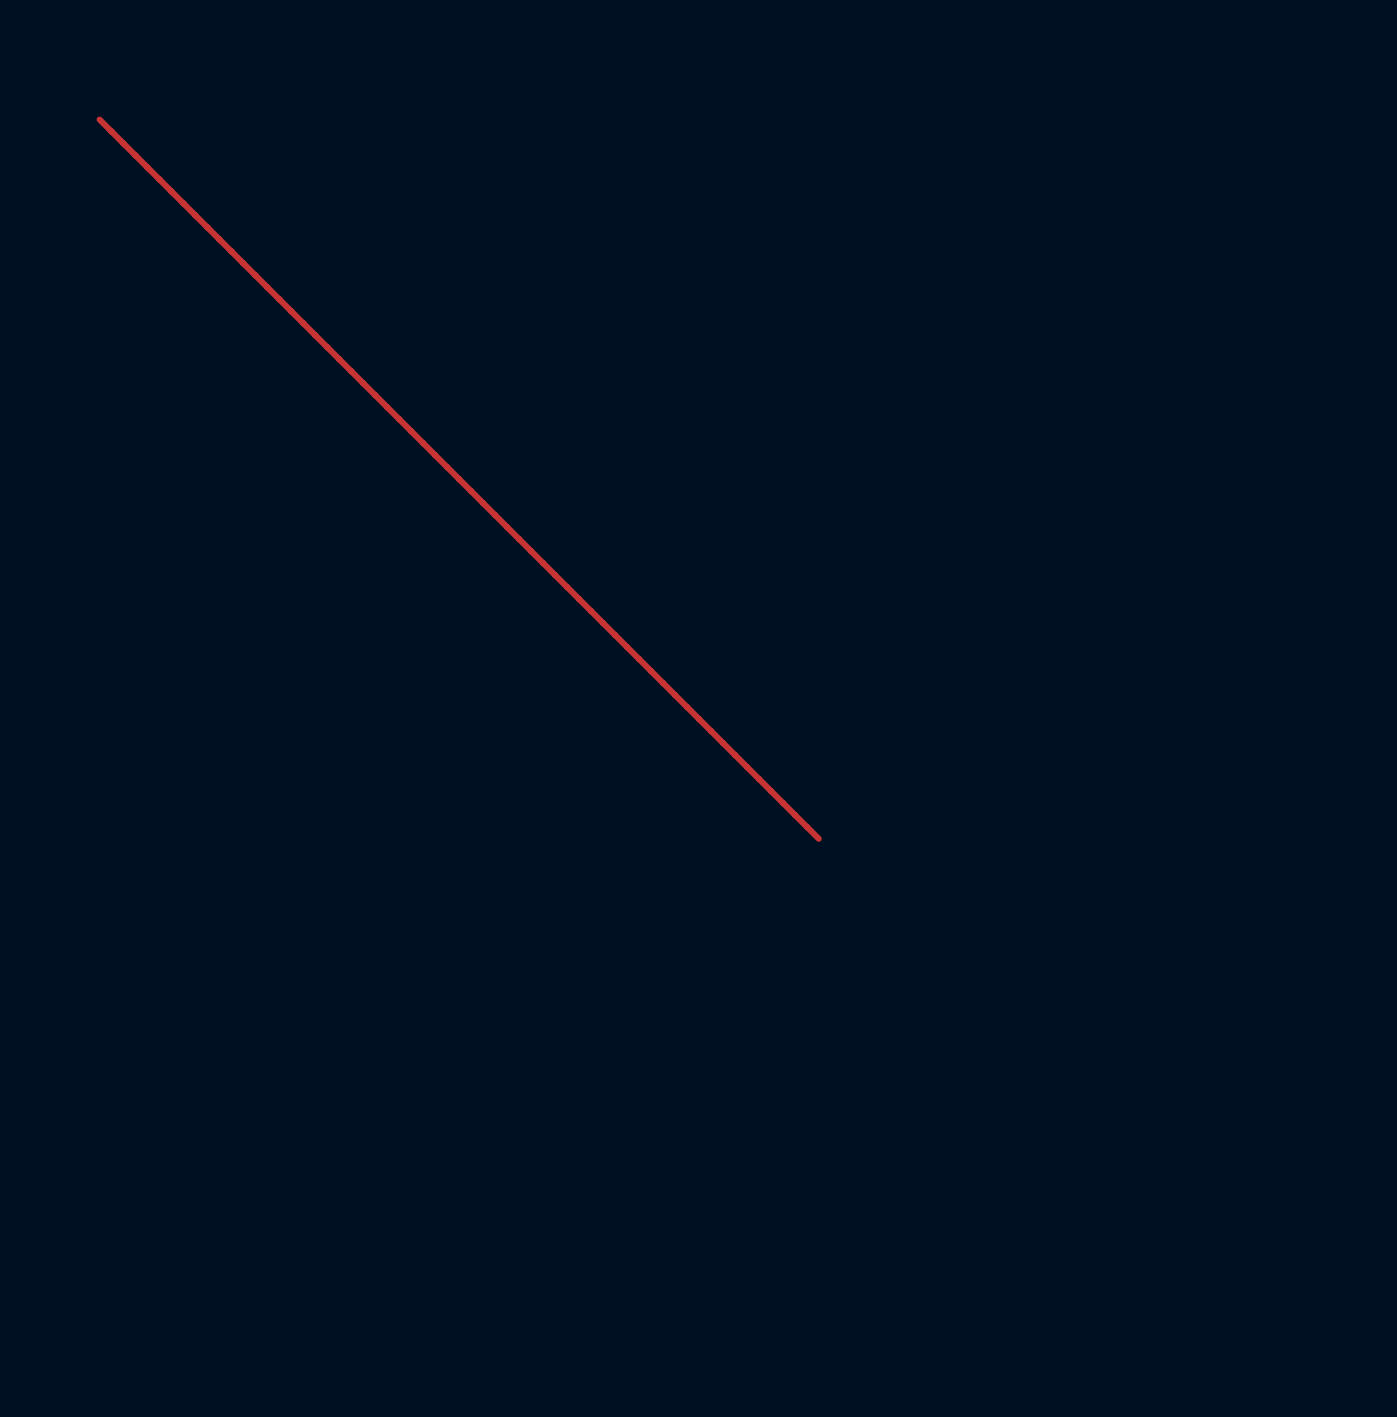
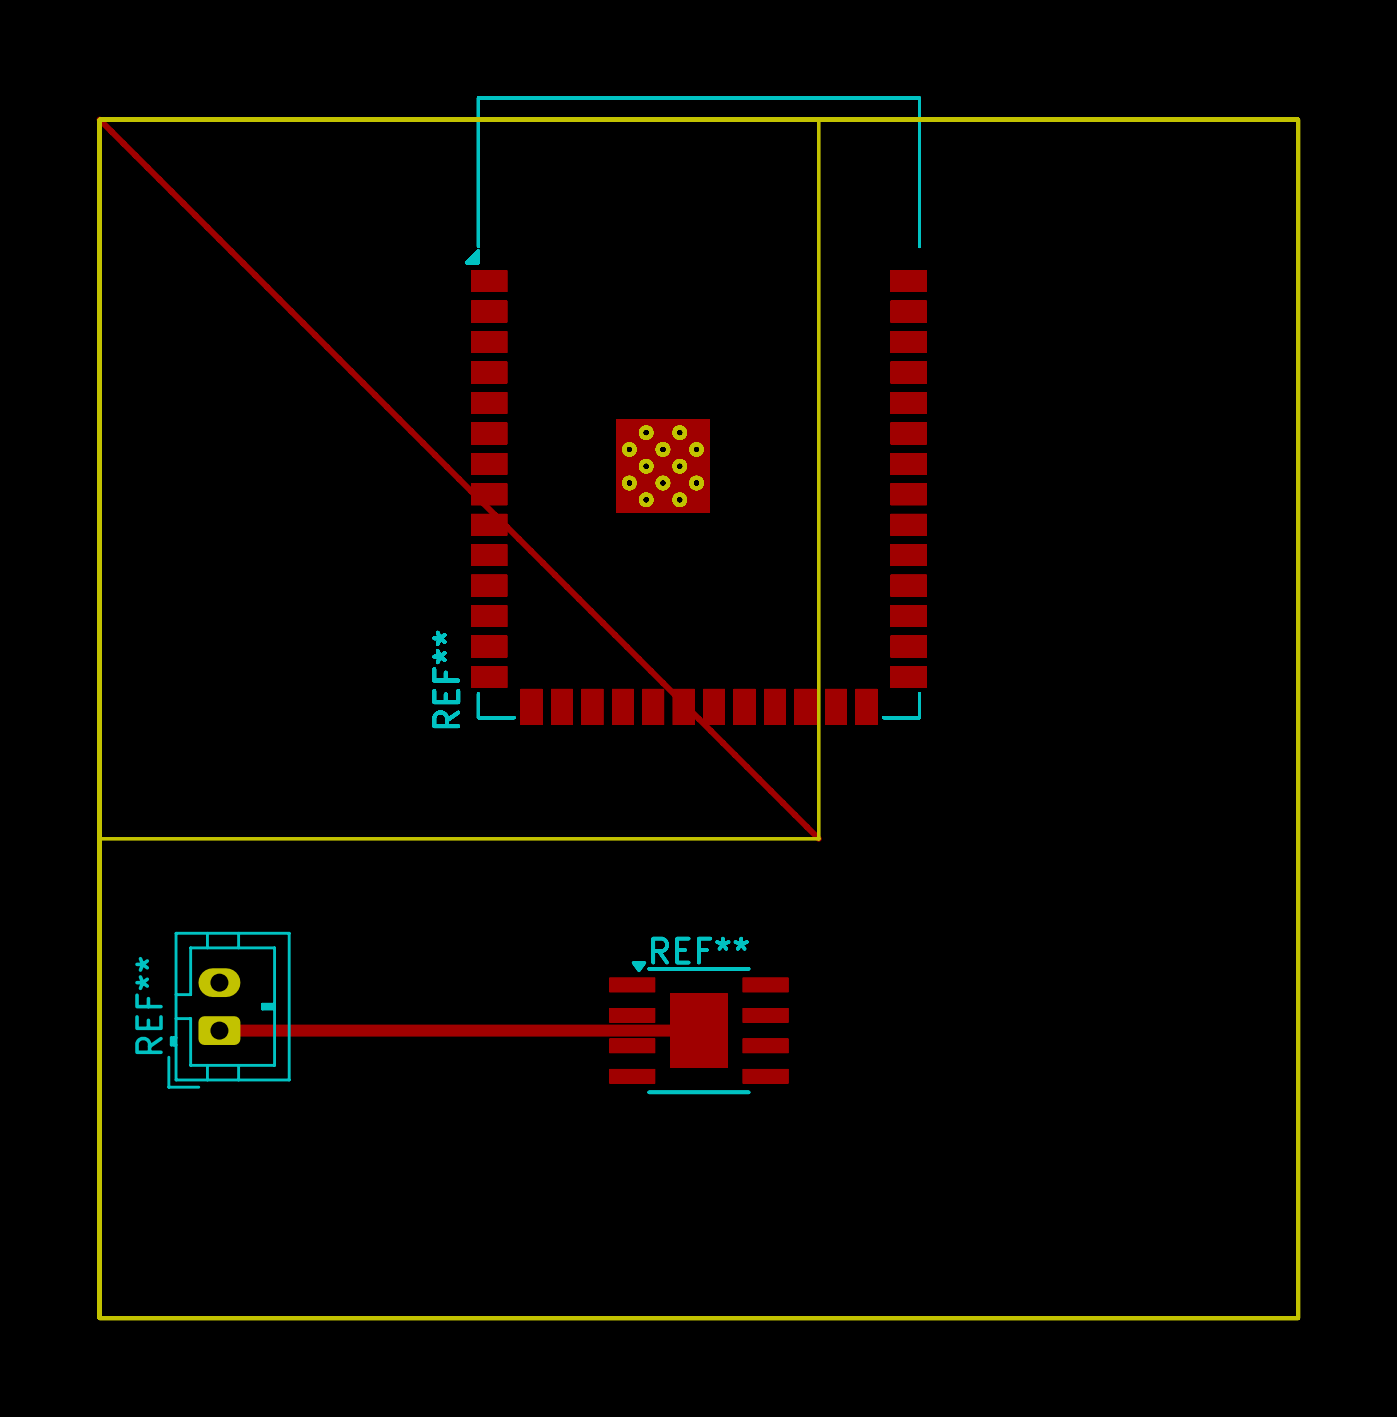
board edge: none -> (99, 119) (1298, 119) (1298, 1318) (99, 1318) (99, 119)
board edge: none -> (818, 119) (818, 838) (99, 838)
REF**: none -> (695, 410)
REF**: none -> (229, 1010)
REF**: none -> (698, 1027)
top track: none -> (219, 1030) (698, 1030)

